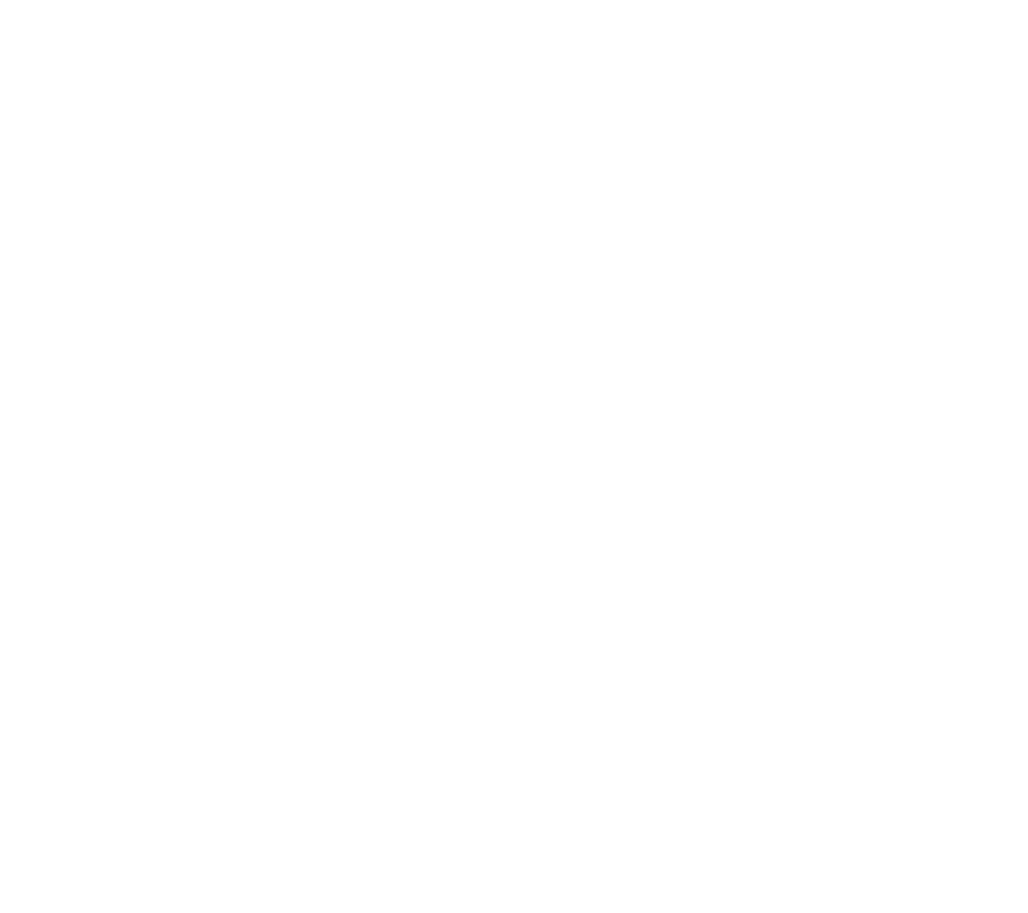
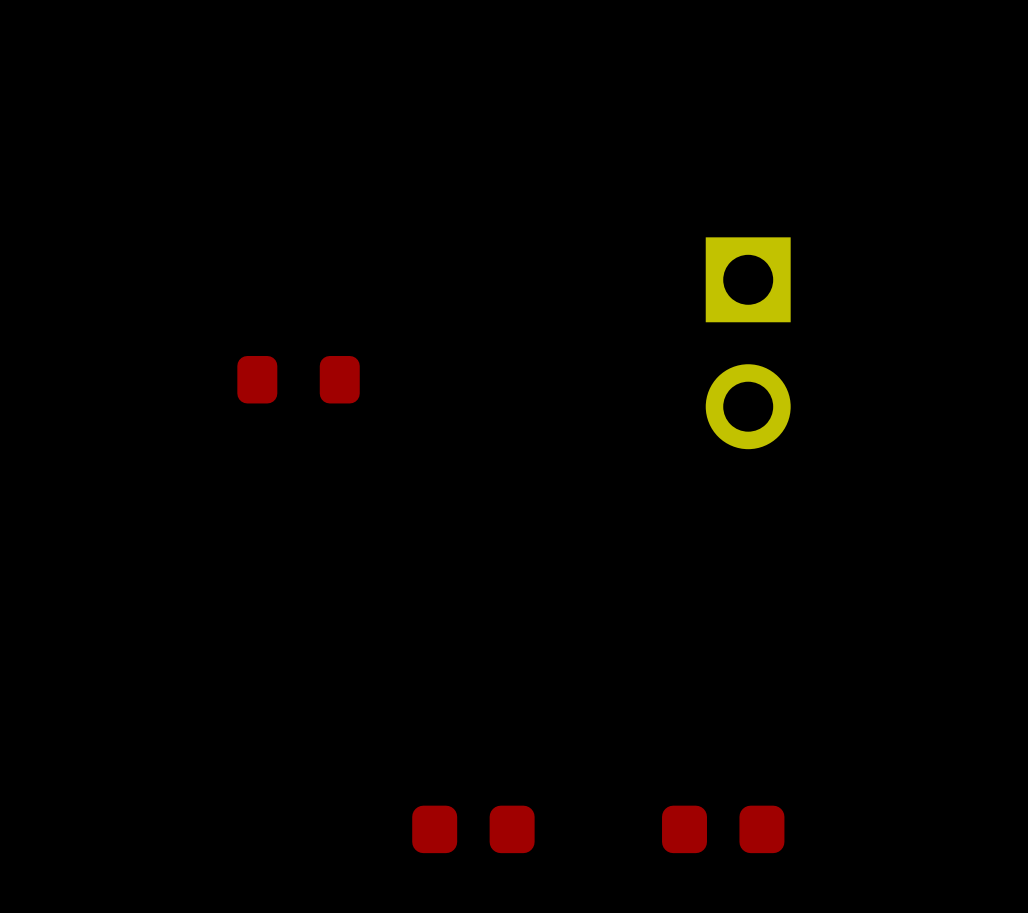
part: none -> (748, 343)
part: none -> (298, 379)
part: none -> (473, 829)
part: none -> (723, 829)

